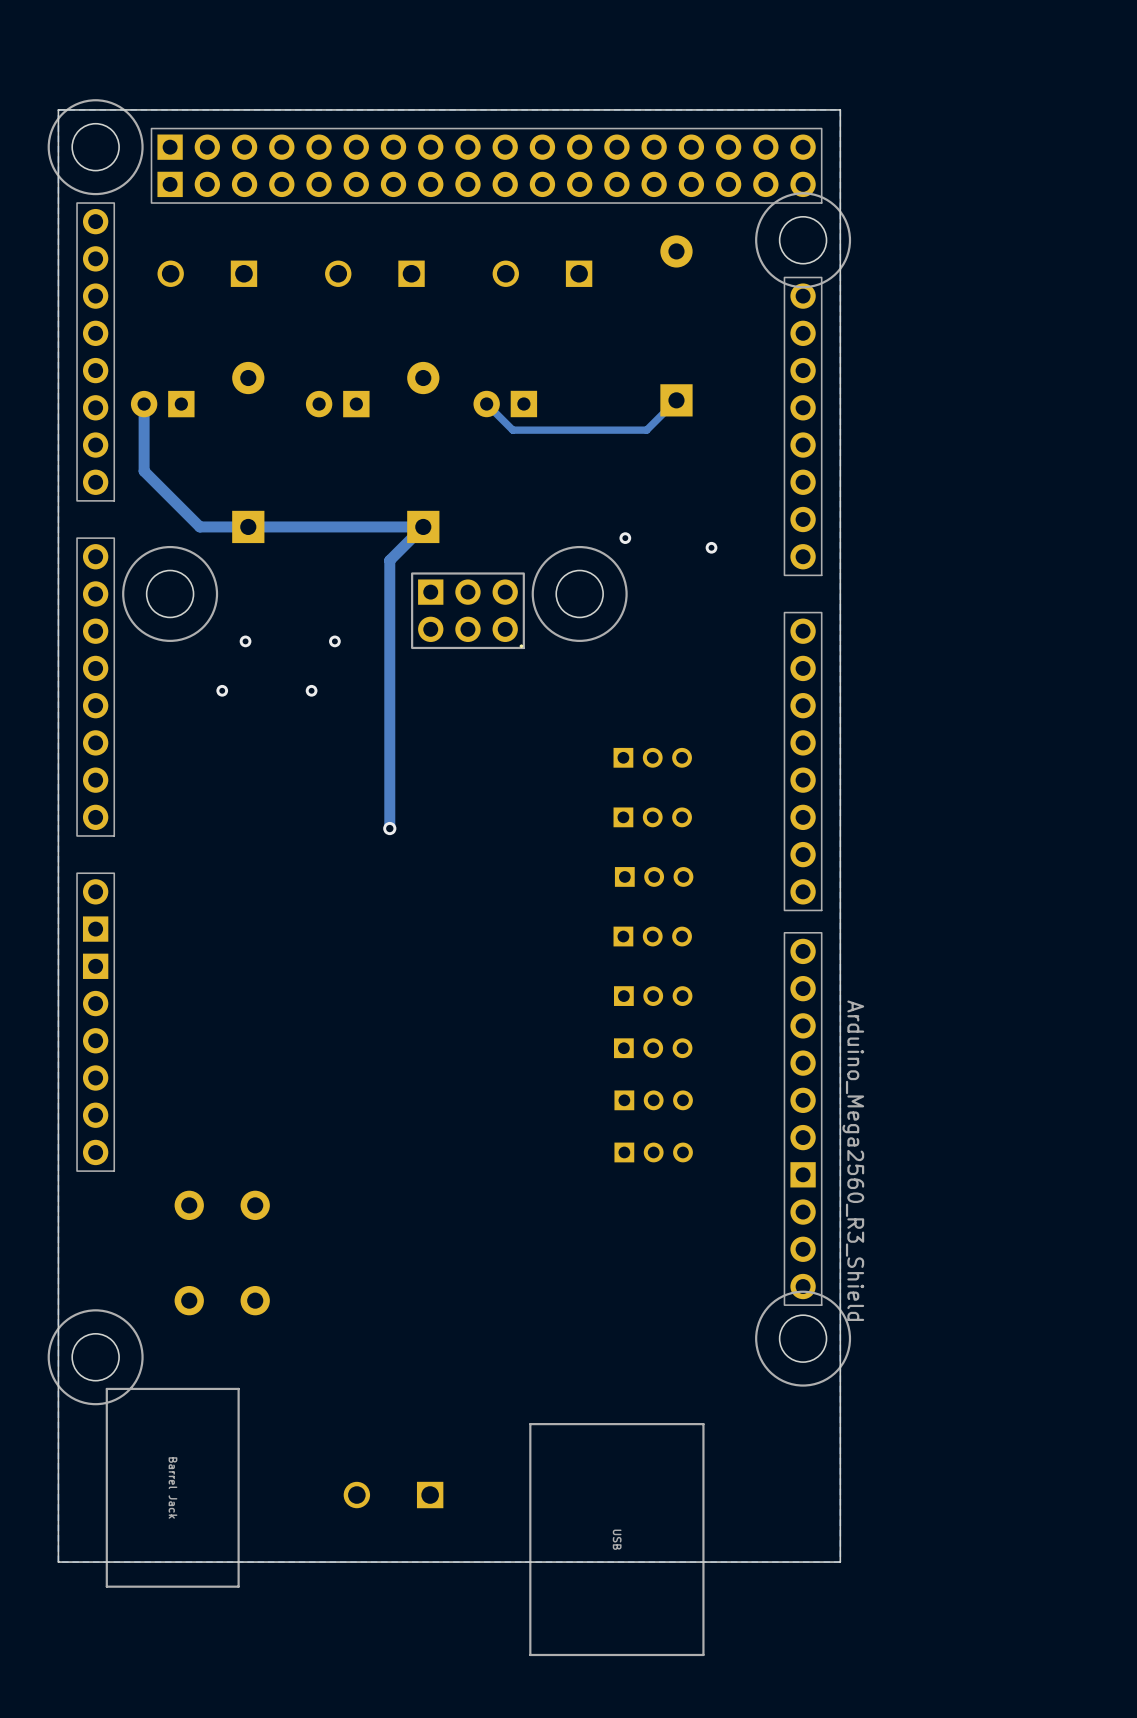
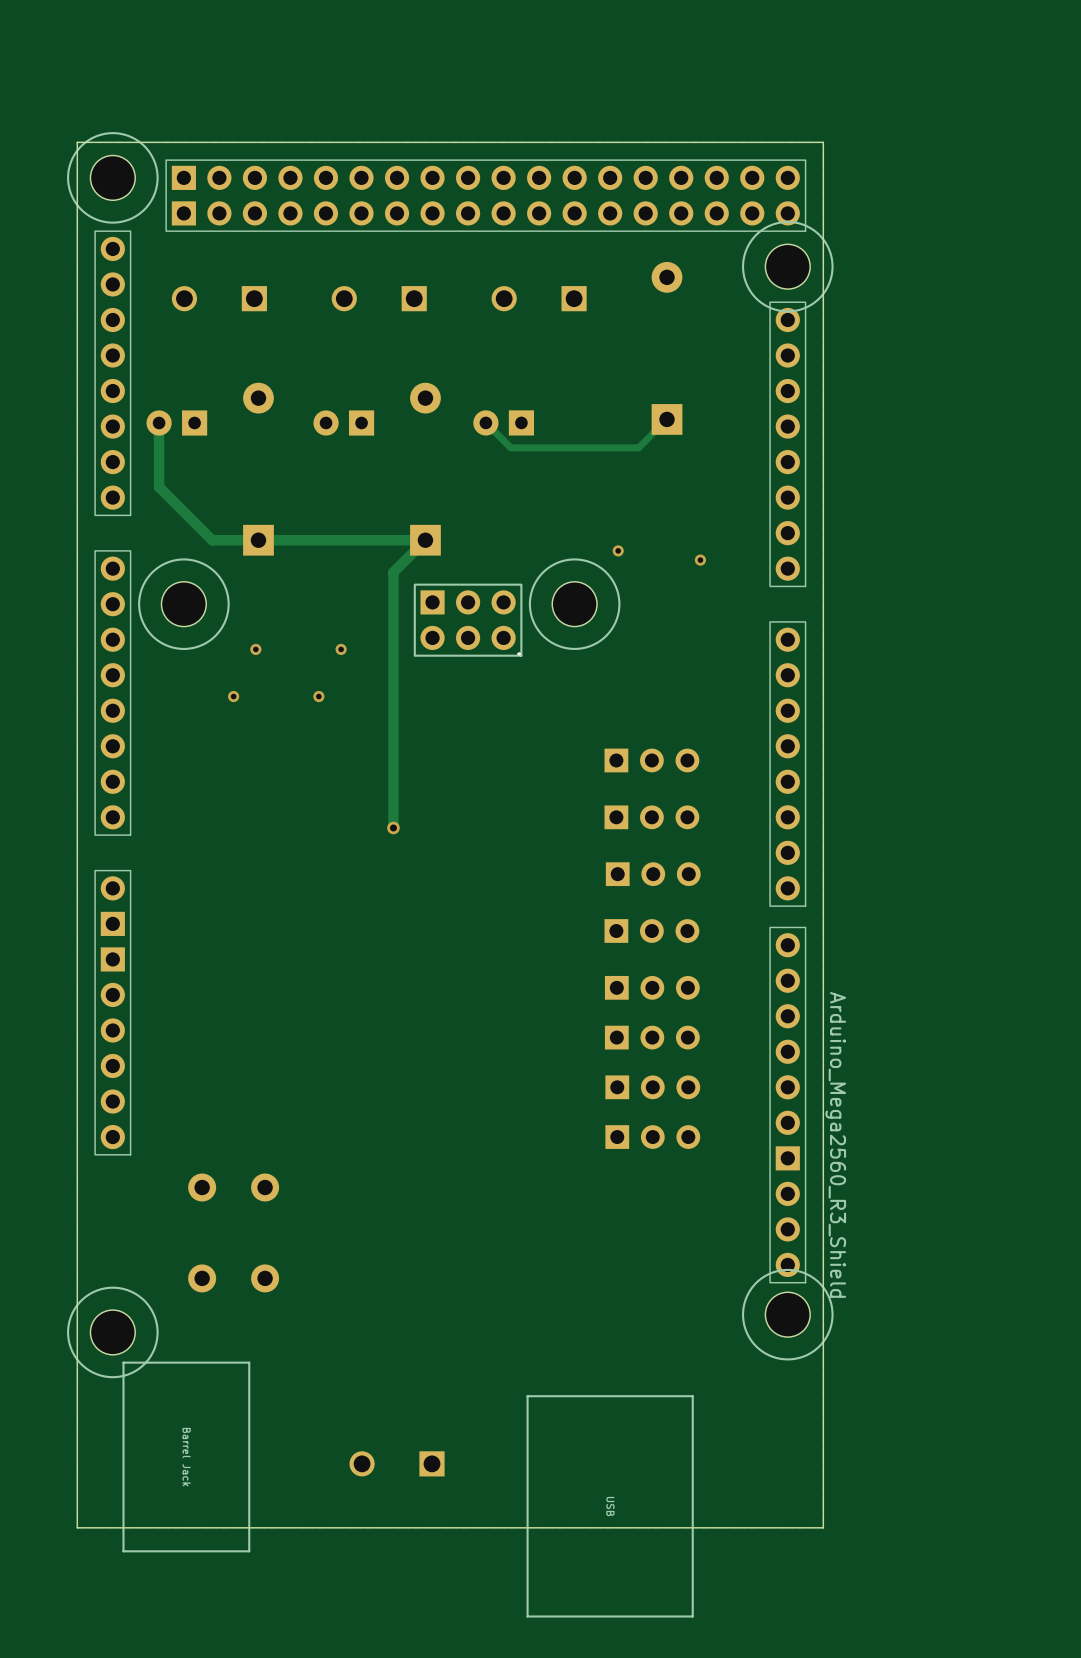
part footprint: [613, 747, 692, 768] -> [604, 748, 700, 773]
part footprint: [613, 807, 692, 828] -> [604, 805, 700, 830]
part footprint: [614, 867, 694, 887] -> [605, 862, 701, 887]
part footprint: [613, 926, 692, 947] -> [604, 919, 700, 943]
part footprint: [613, 986, 693, 1006] -> [604, 975, 700, 1000]
part footprint: [613, 1038, 693, 1059] -> [604, 1025, 700, 1050]
part footprint: [614, 1090, 693, 1111] -> [605, 1075, 701, 1100]
part footprint: [614, 1142, 693, 1163] -> [605, 1125, 701, 1149]

